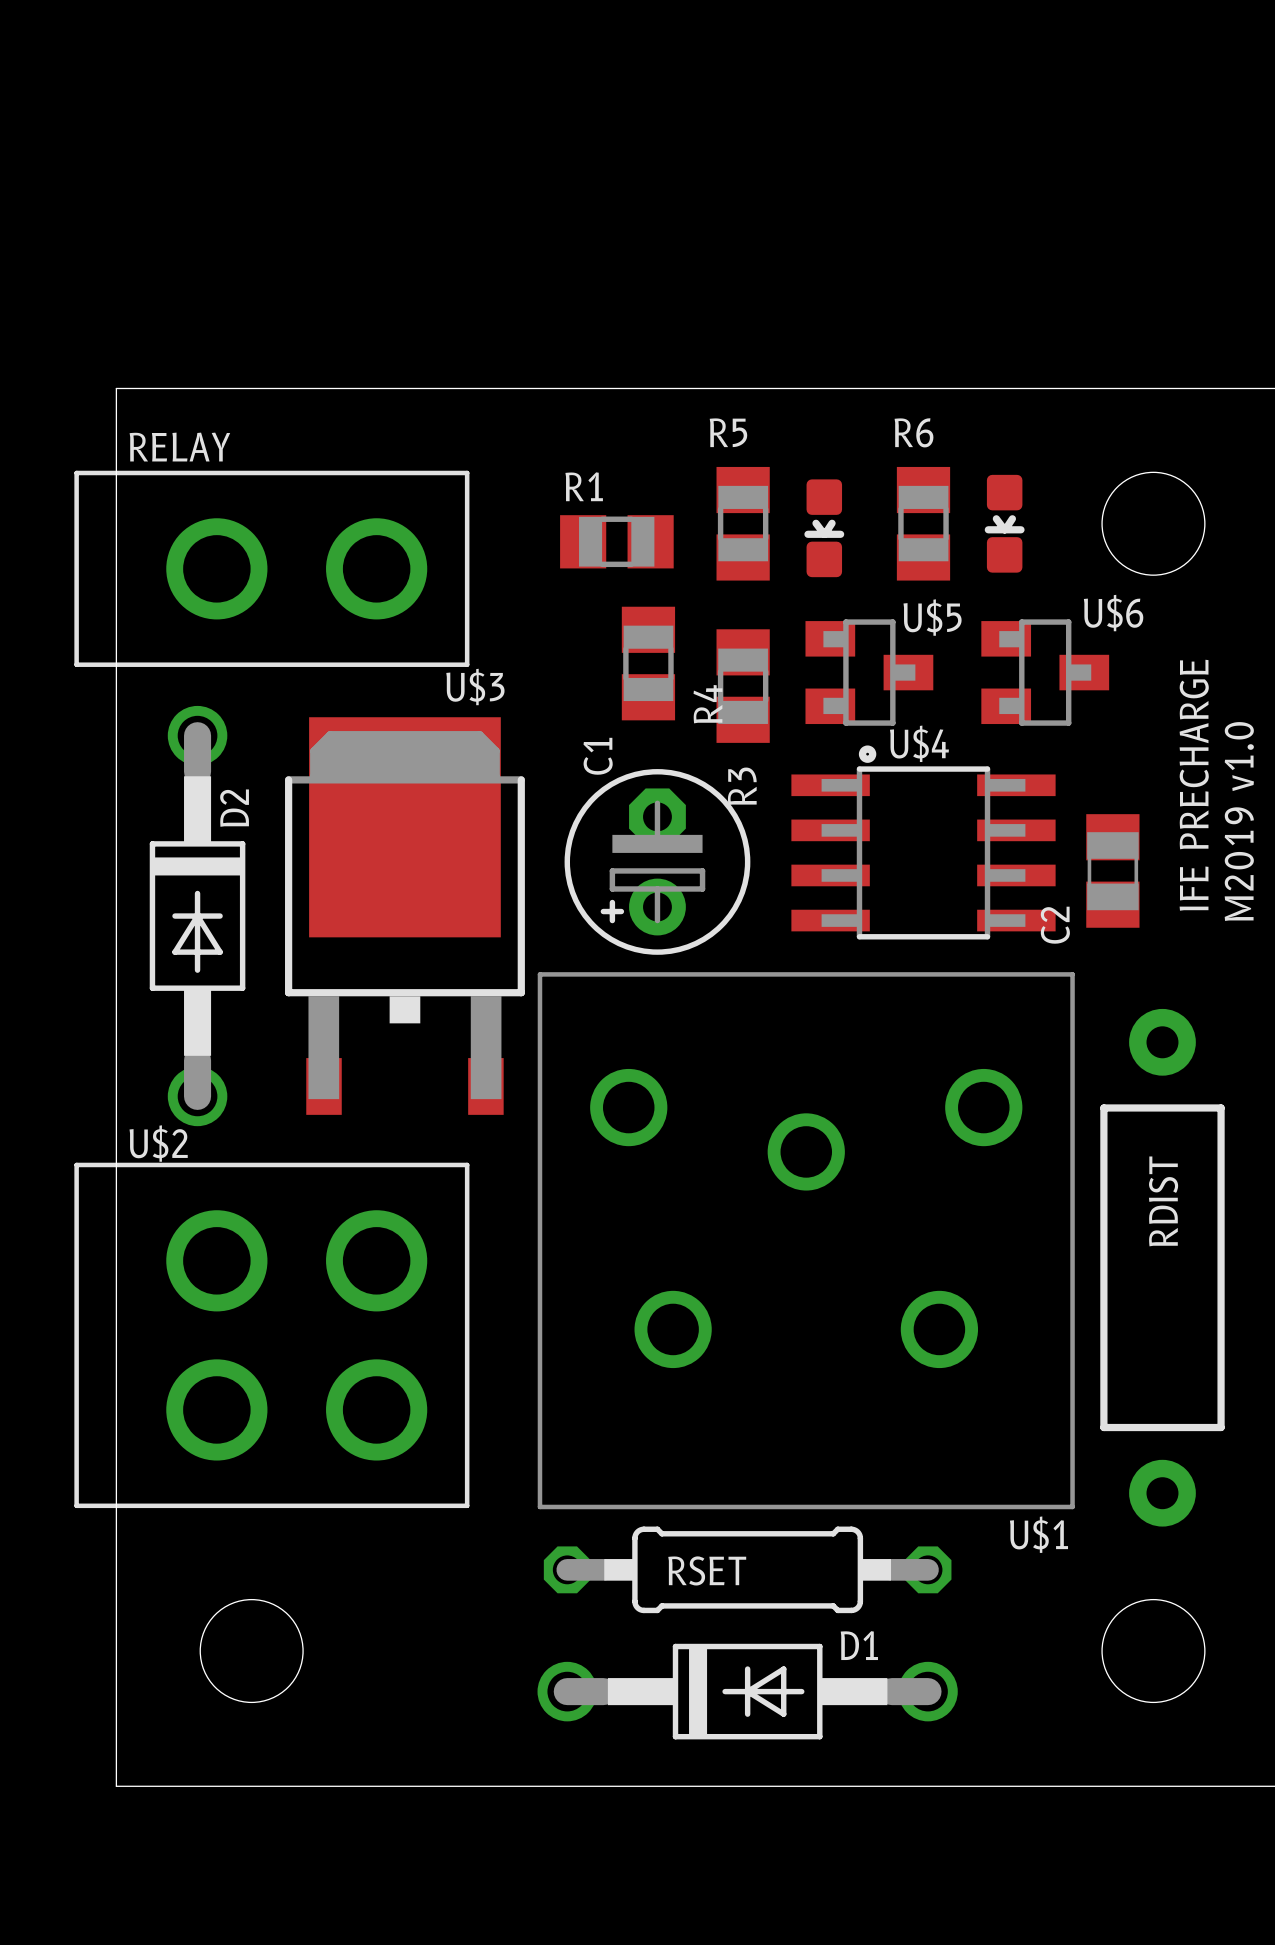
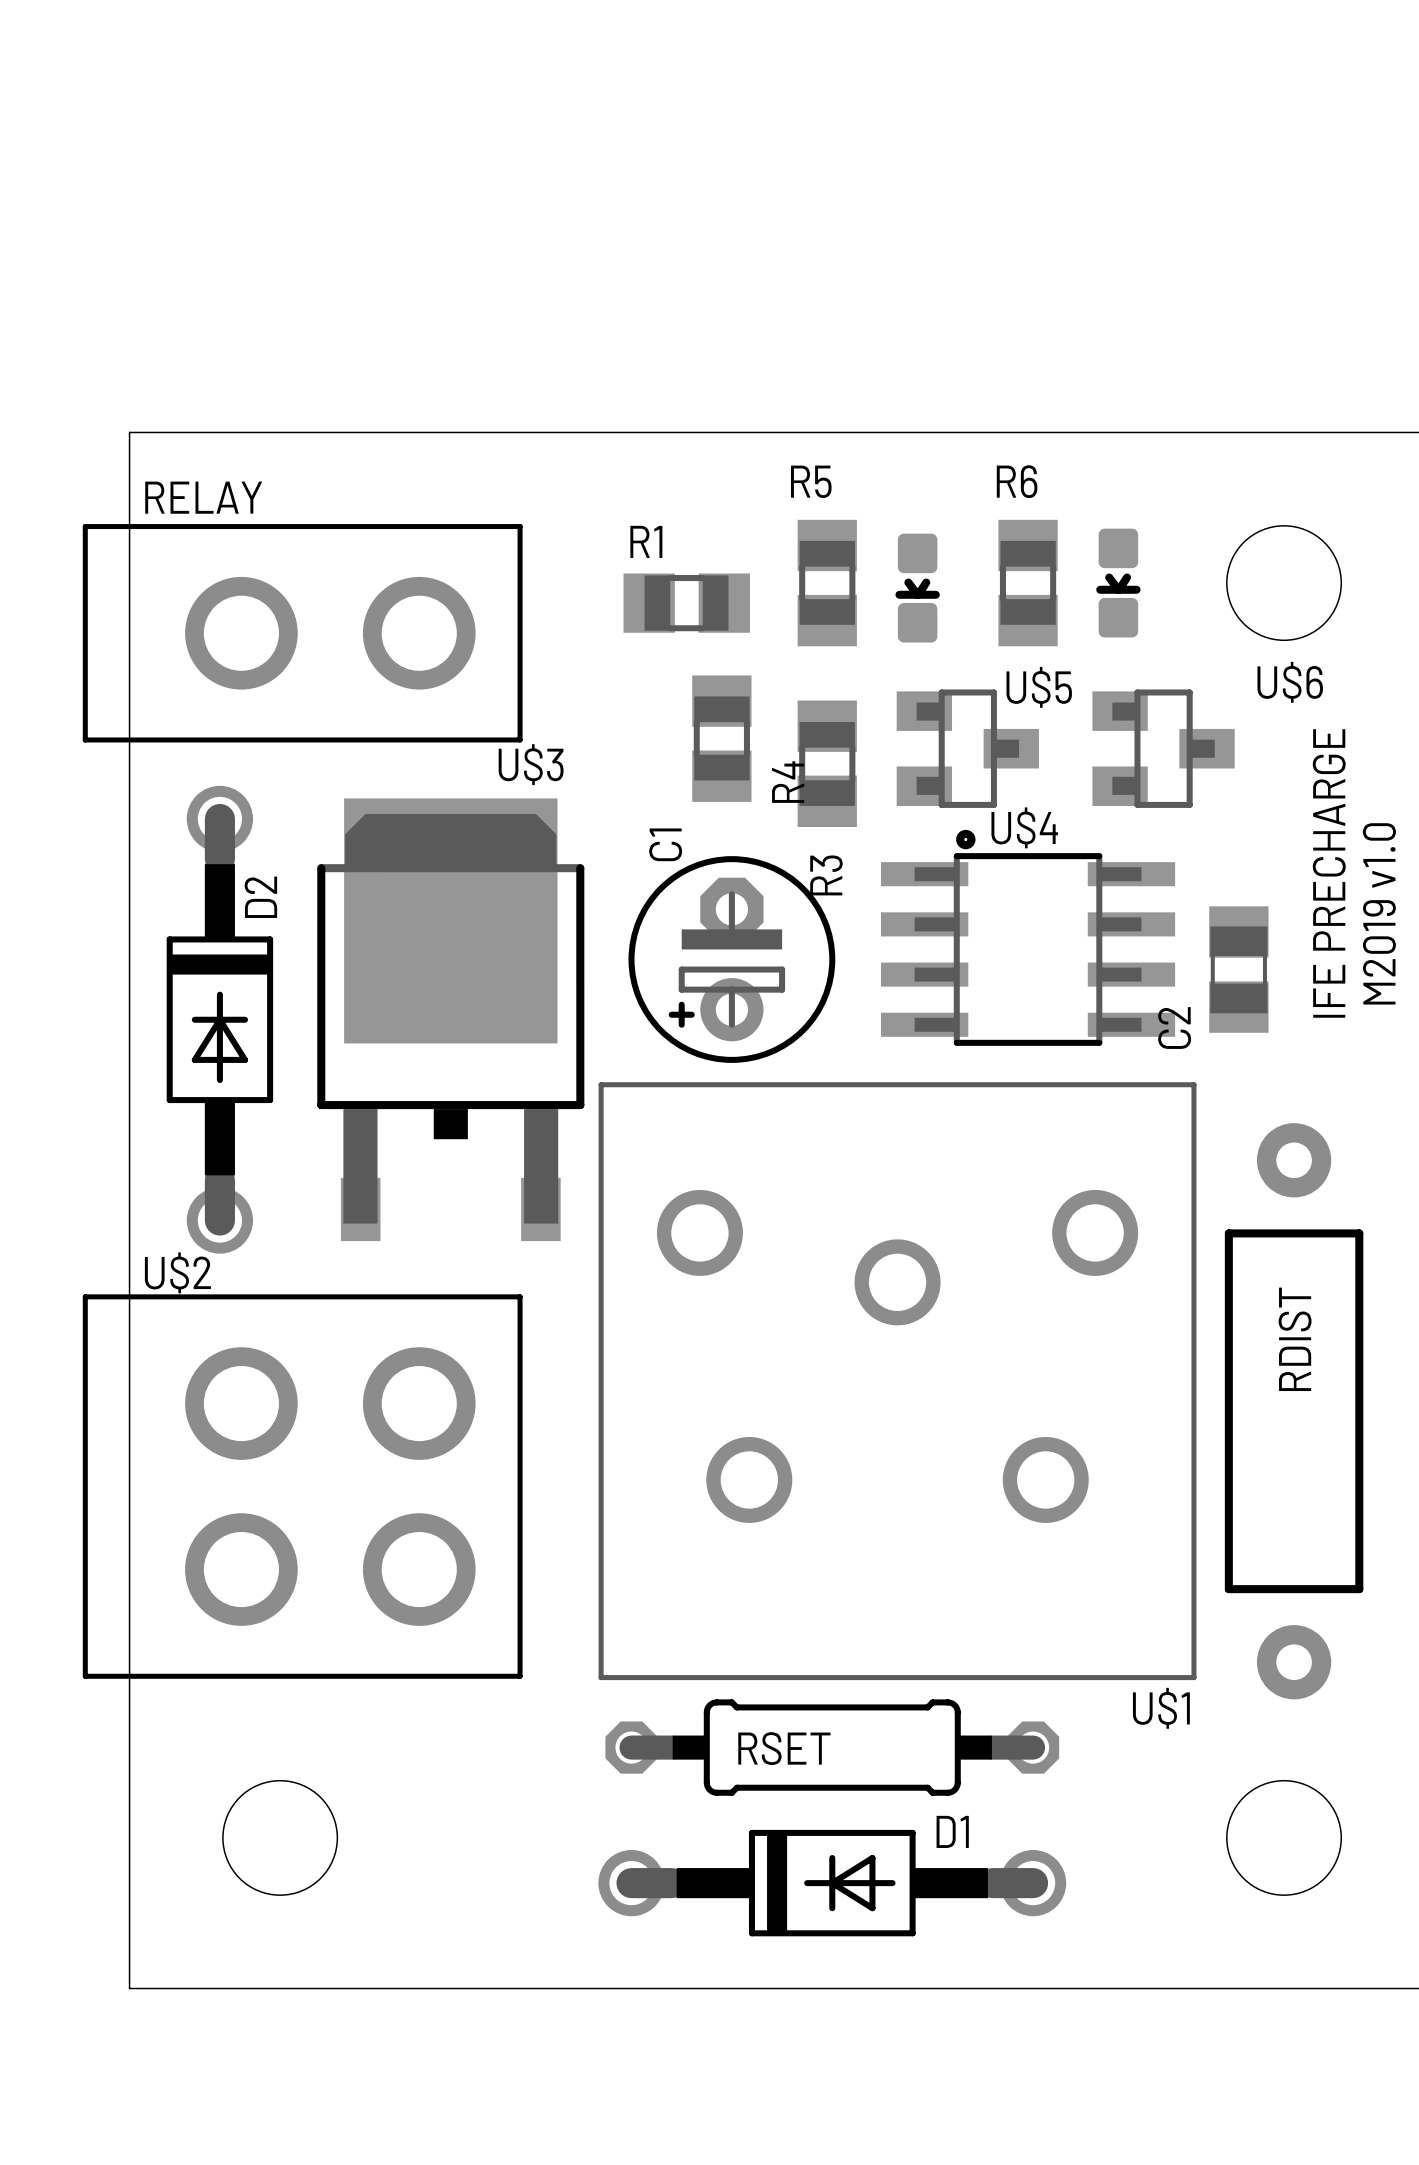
U$6 name position: U$6 (1113, 613) -> U$6 (1290, 682)

